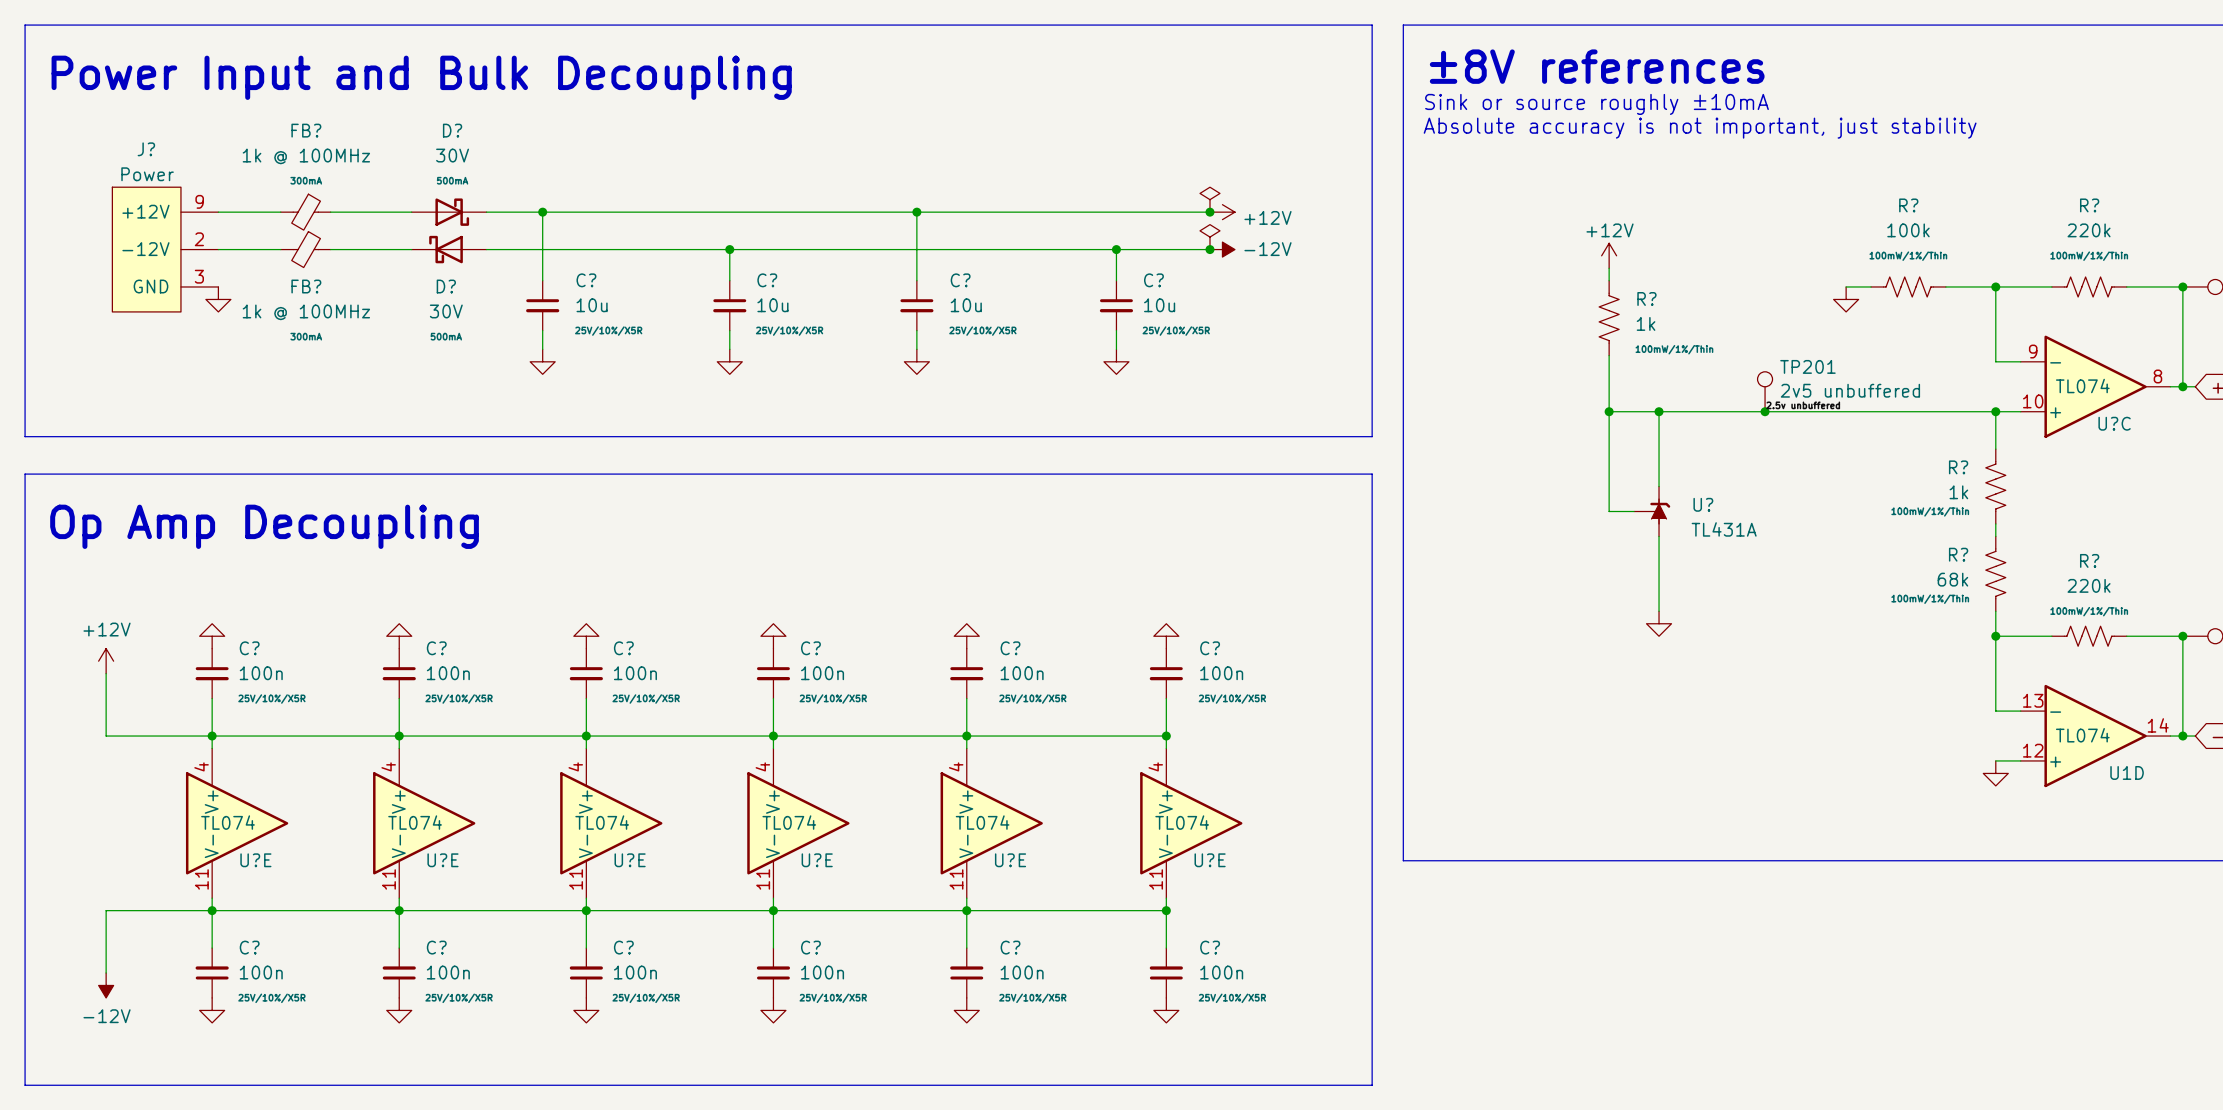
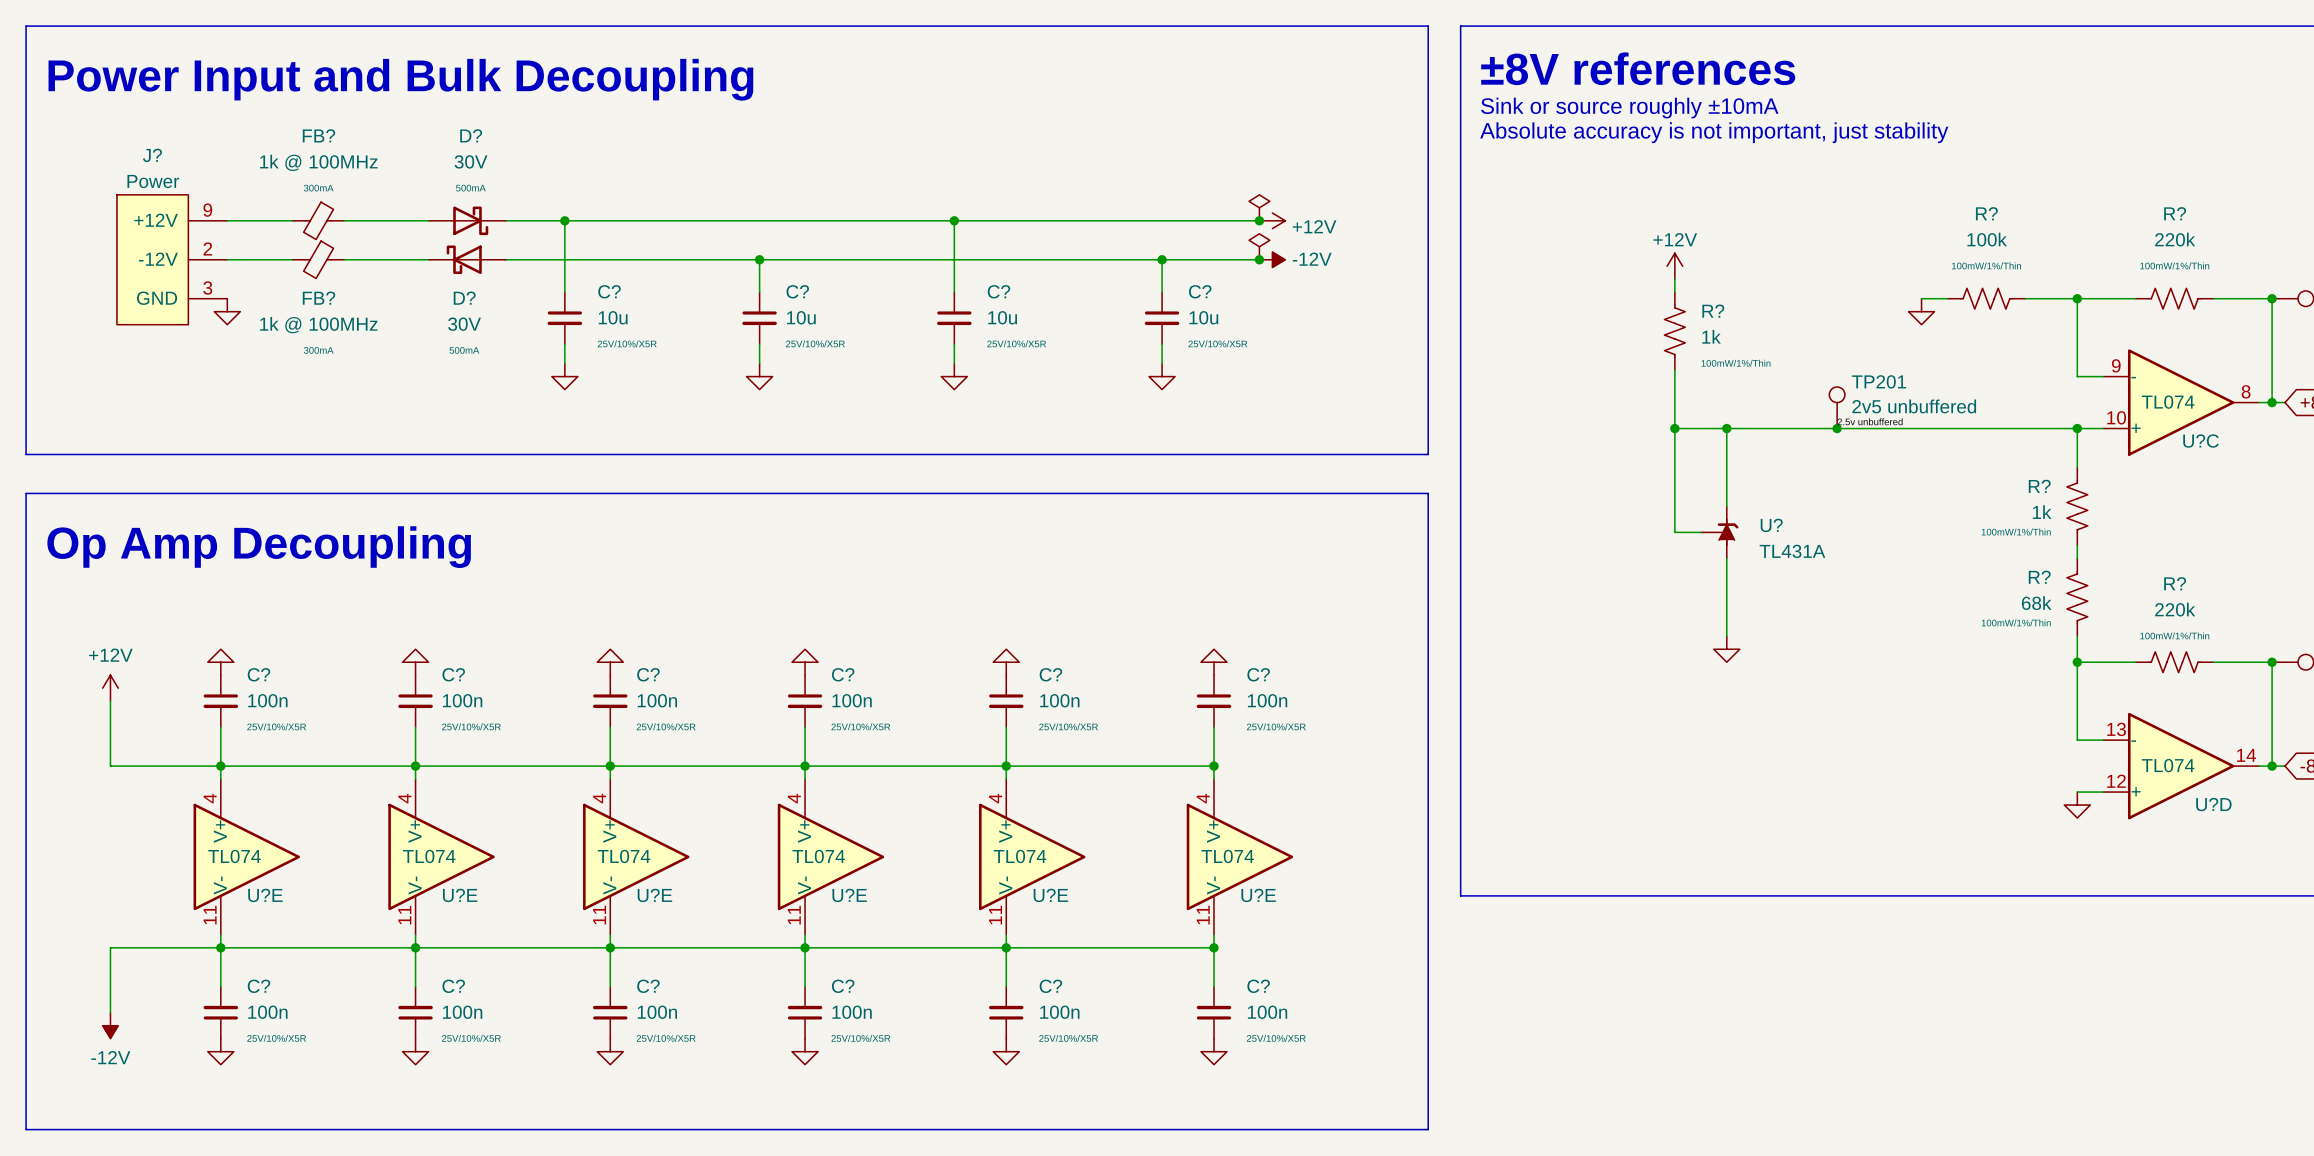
U1D name: U1D (2127, 772) -> U?D (2213, 804)

